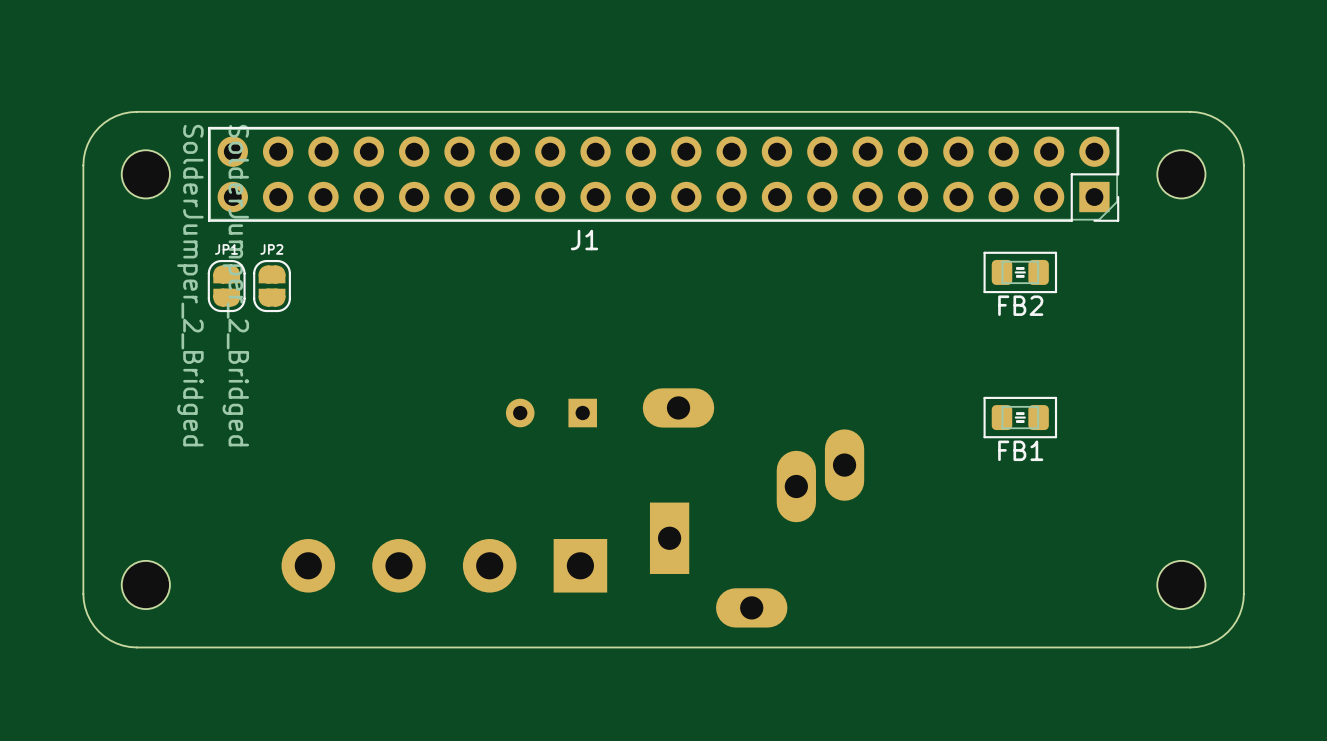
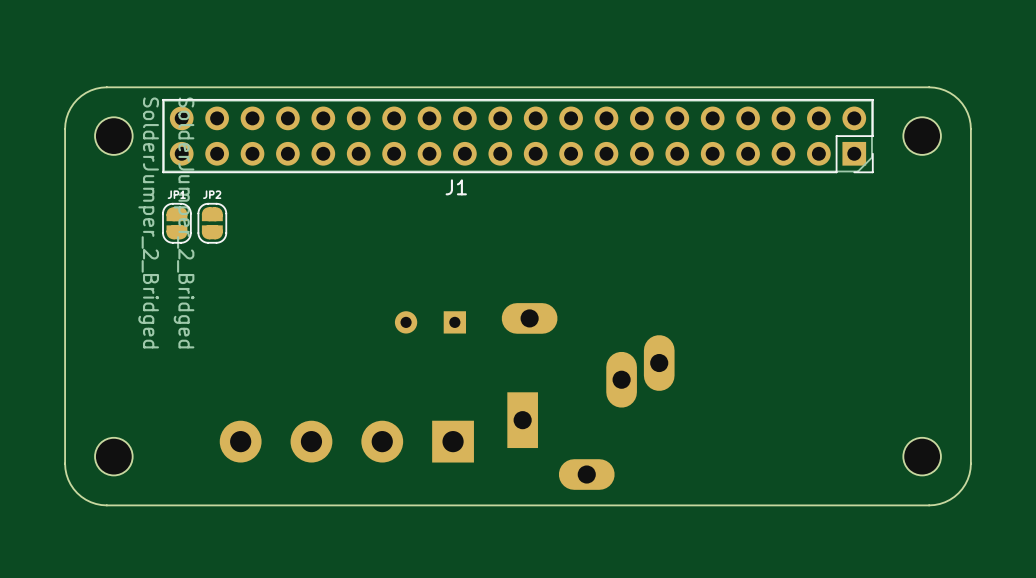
FB2: (1020, 272) -> none
FB1: (1020, 417) -> none

